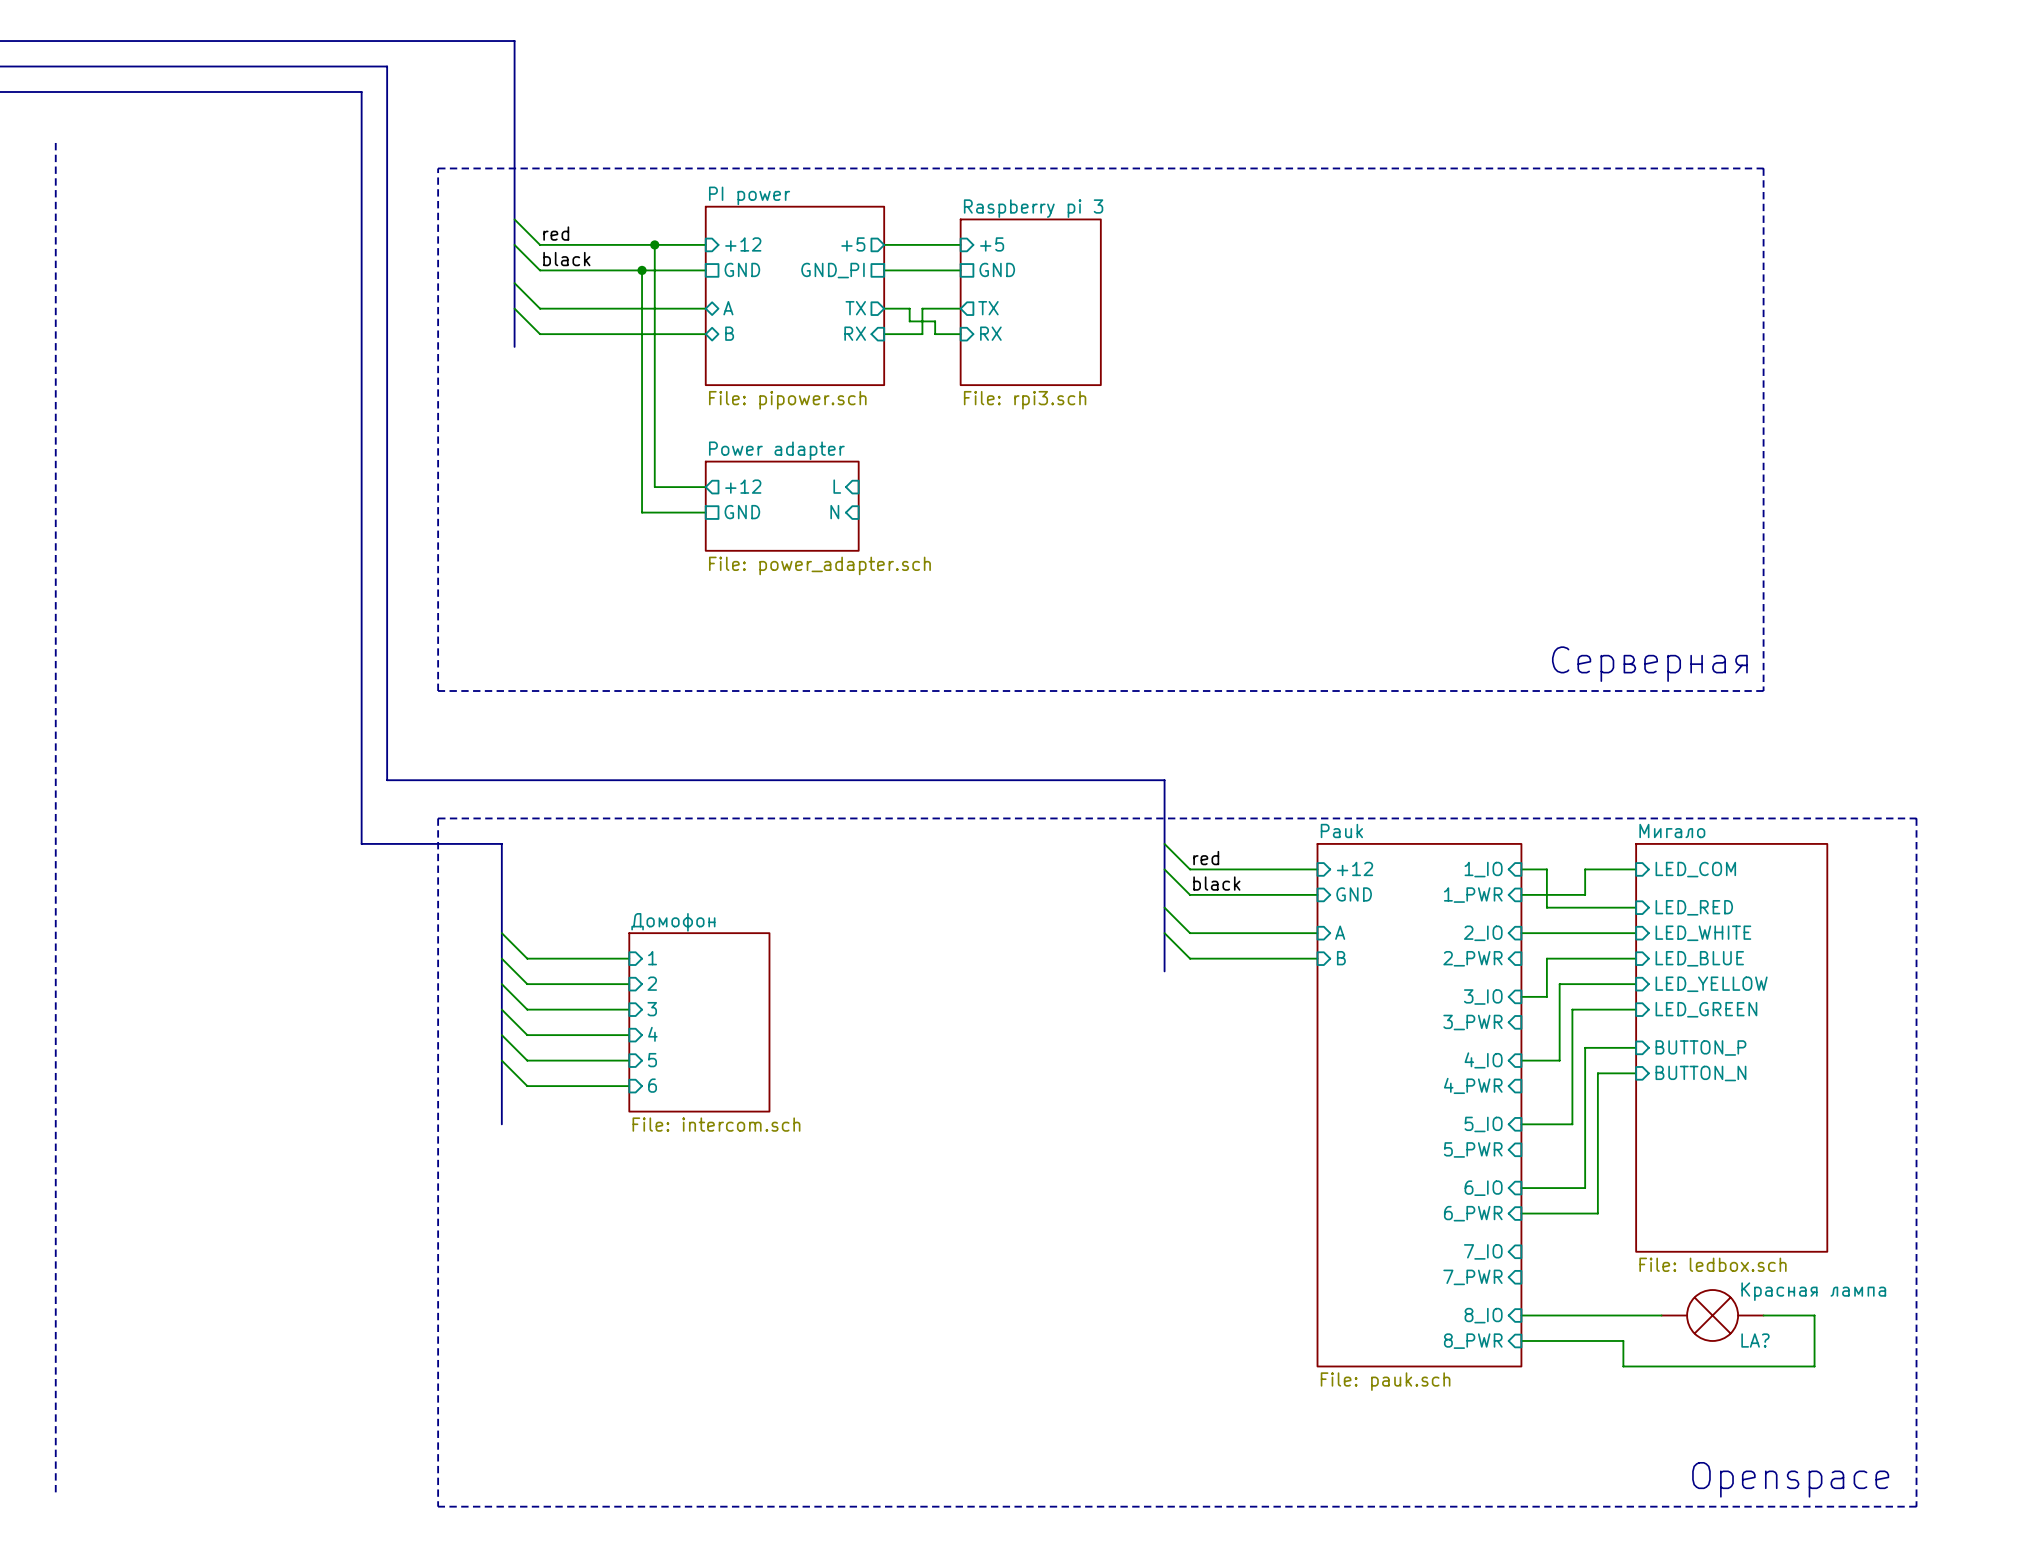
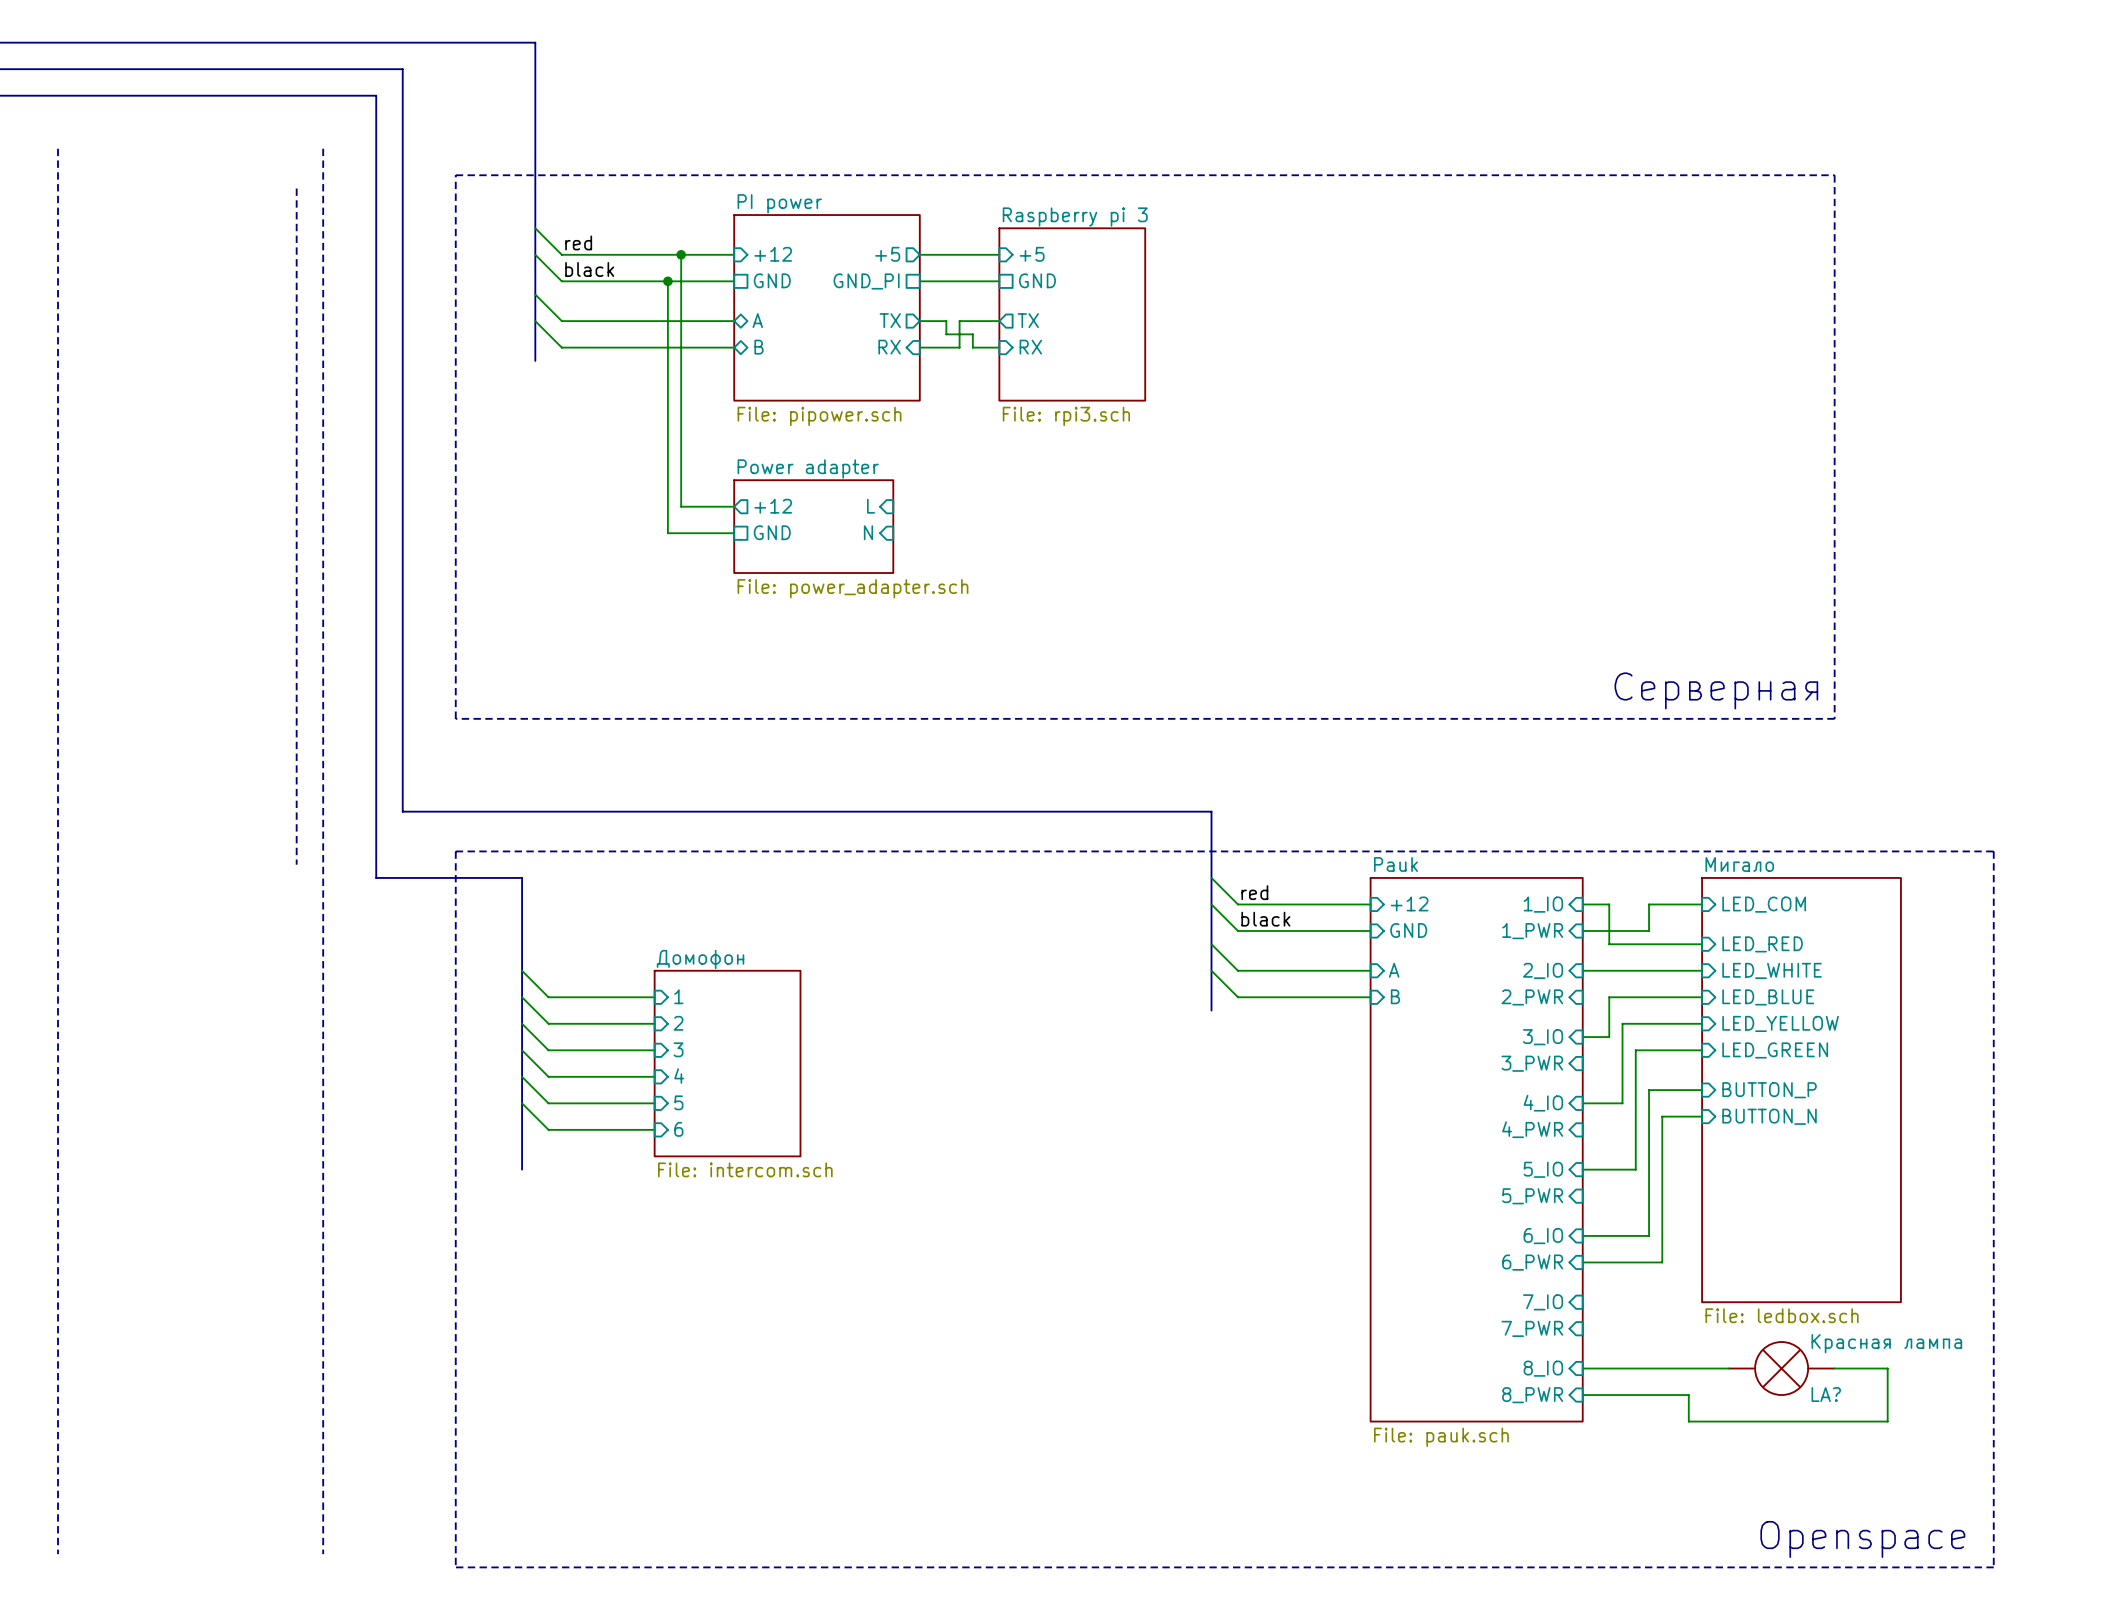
line: none -> (323, 148) (323, 1554)
line: none -> (296, 188) (296, 864)

